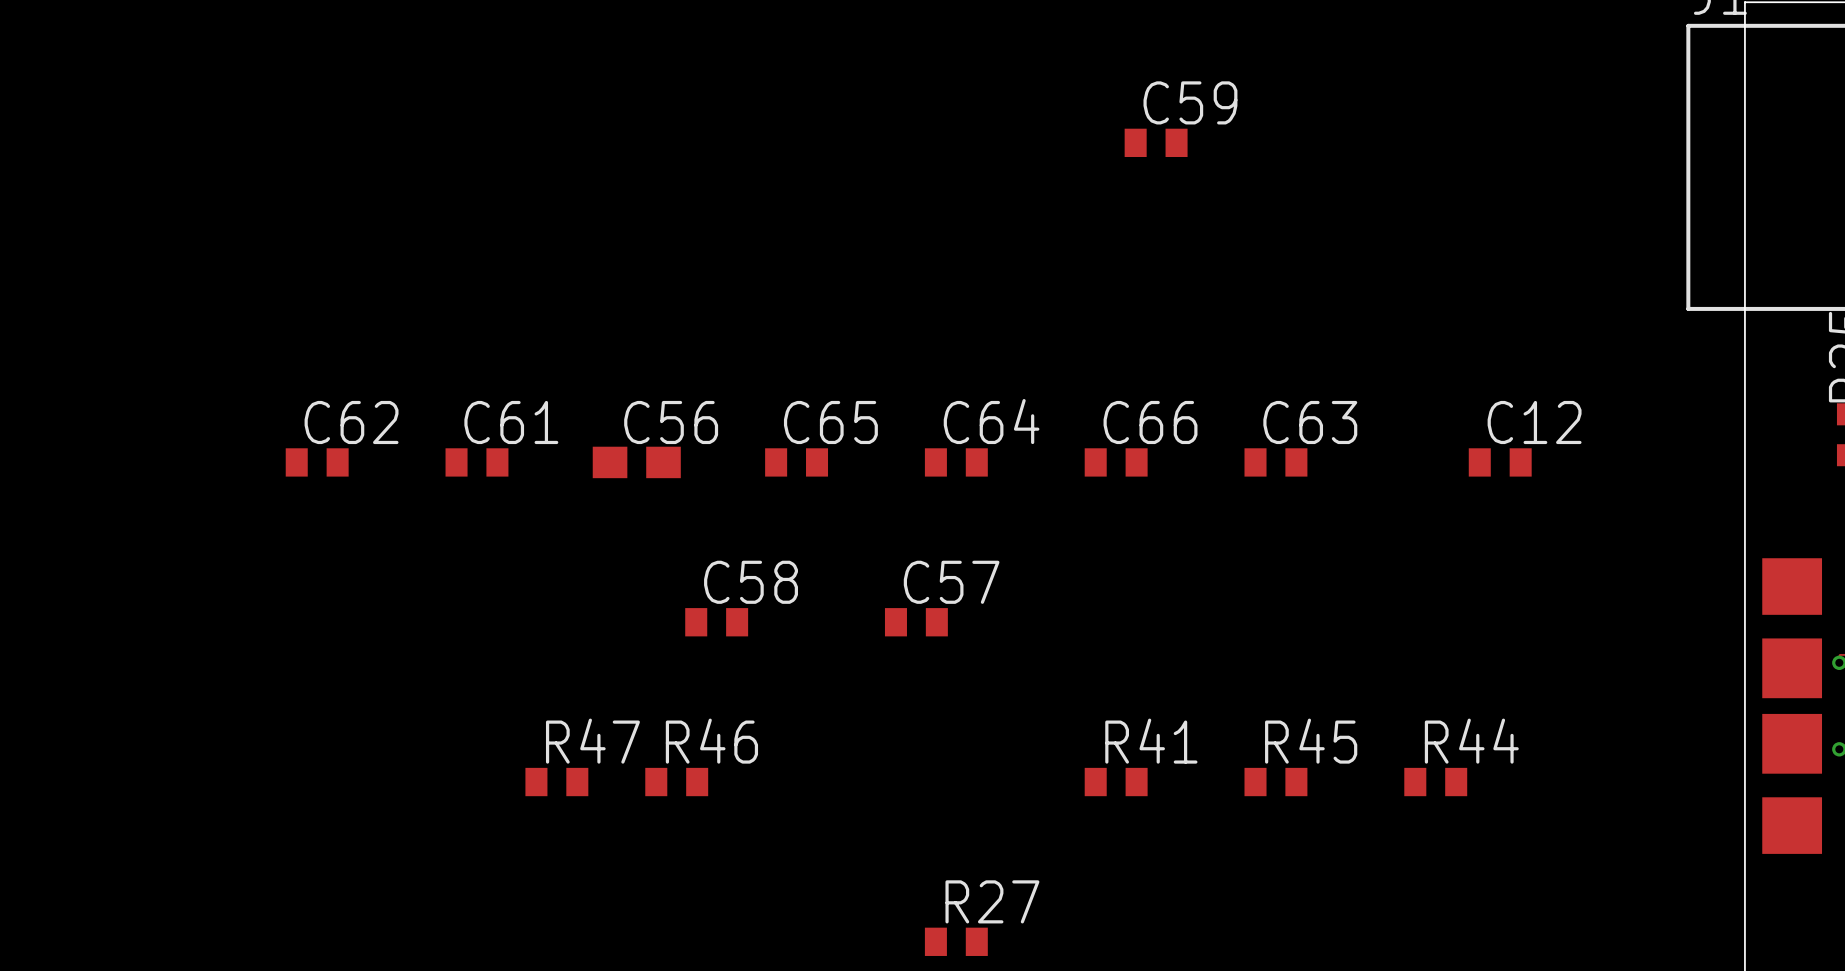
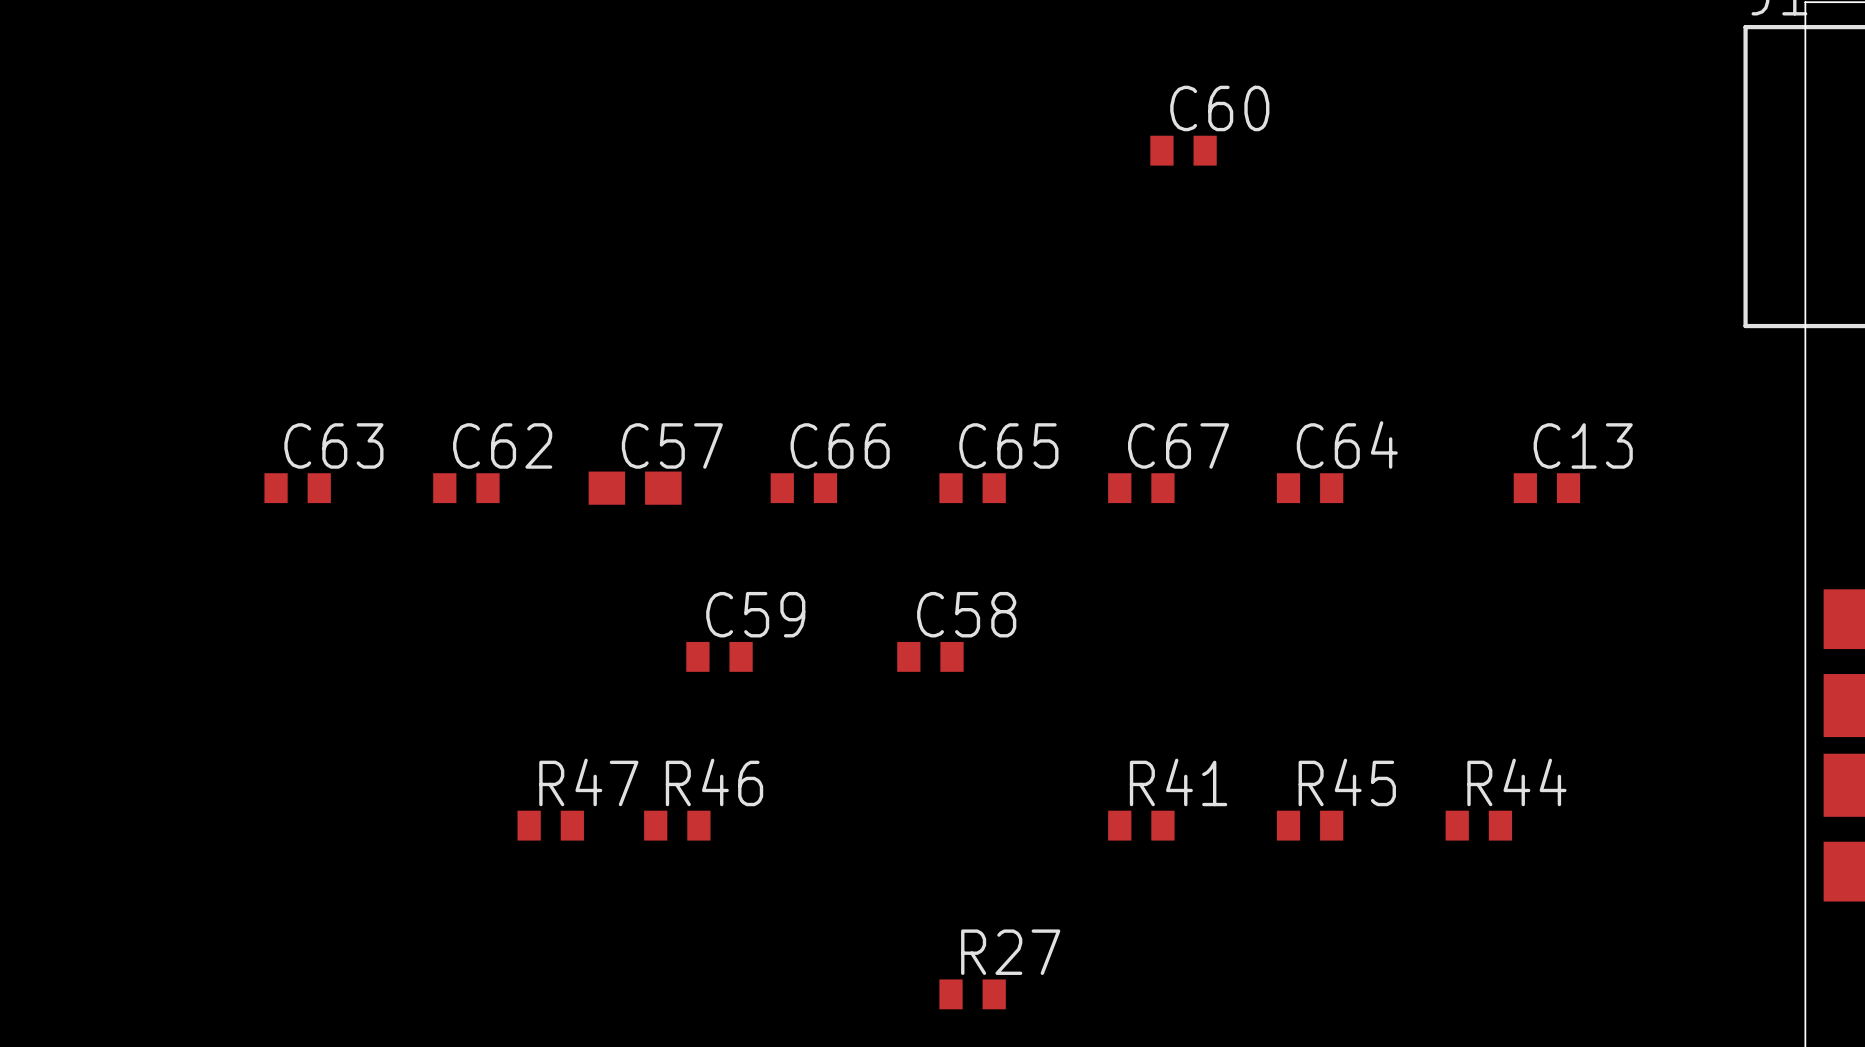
C59 name: C59 (1190, 102) -> C60 (1219, 108)
C64 name: C64 (991, 421) -> C65 (1008, 445)
C62 name: C62 (351, 422) -> C63 (333, 445)
C61 name: C61 (511, 422) -> C62 (502, 445)
C56 name: C56 (671, 422) -> C57 (672, 445)
C65 name: C65 (830, 422) -> C66 (840, 445)
C66 name: C66 (1150, 422) -> C67 (1178, 445)
C63 name: C63 (1310, 422) -> C64 (1347, 444)
C12 name: C12 (1534, 422) -> C13 (1583, 445)
C58 name: C58 (751, 582) -> C59 (755, 614)
C57 name: C57 (951, 582) -> C58 (966, 614)

